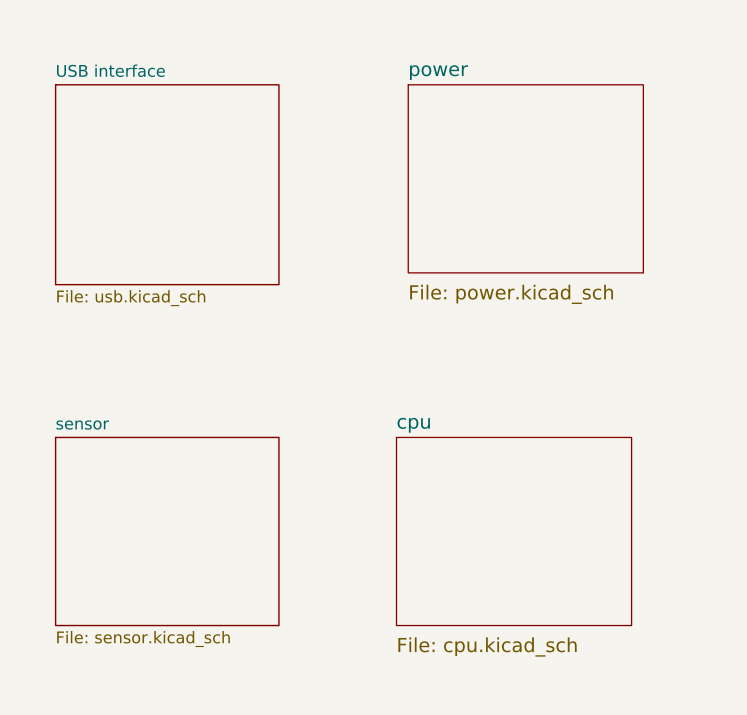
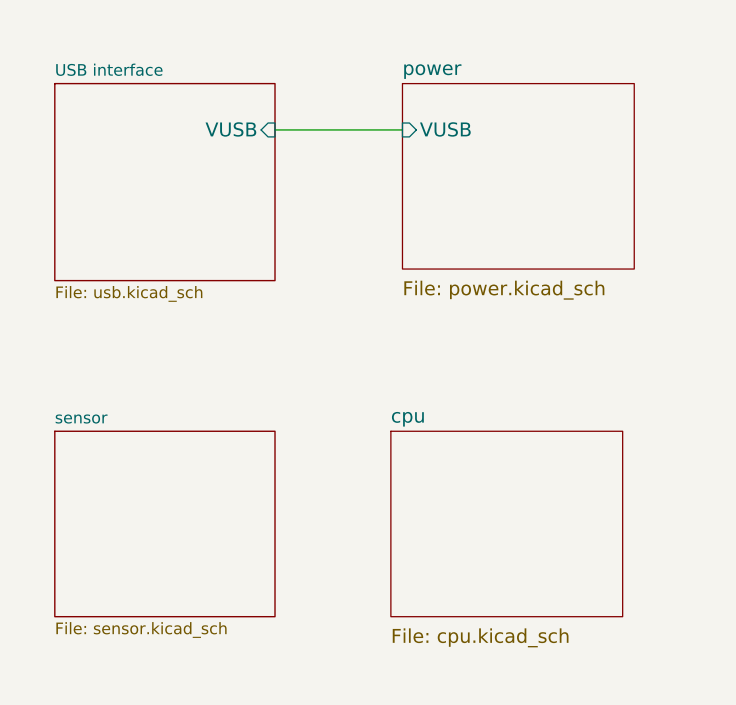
sheet pin: none -> VUSB (230, 129)
wire: none -> (275, 129) (402, 129)
sheet pin: none -> VUSB (445, 129)

